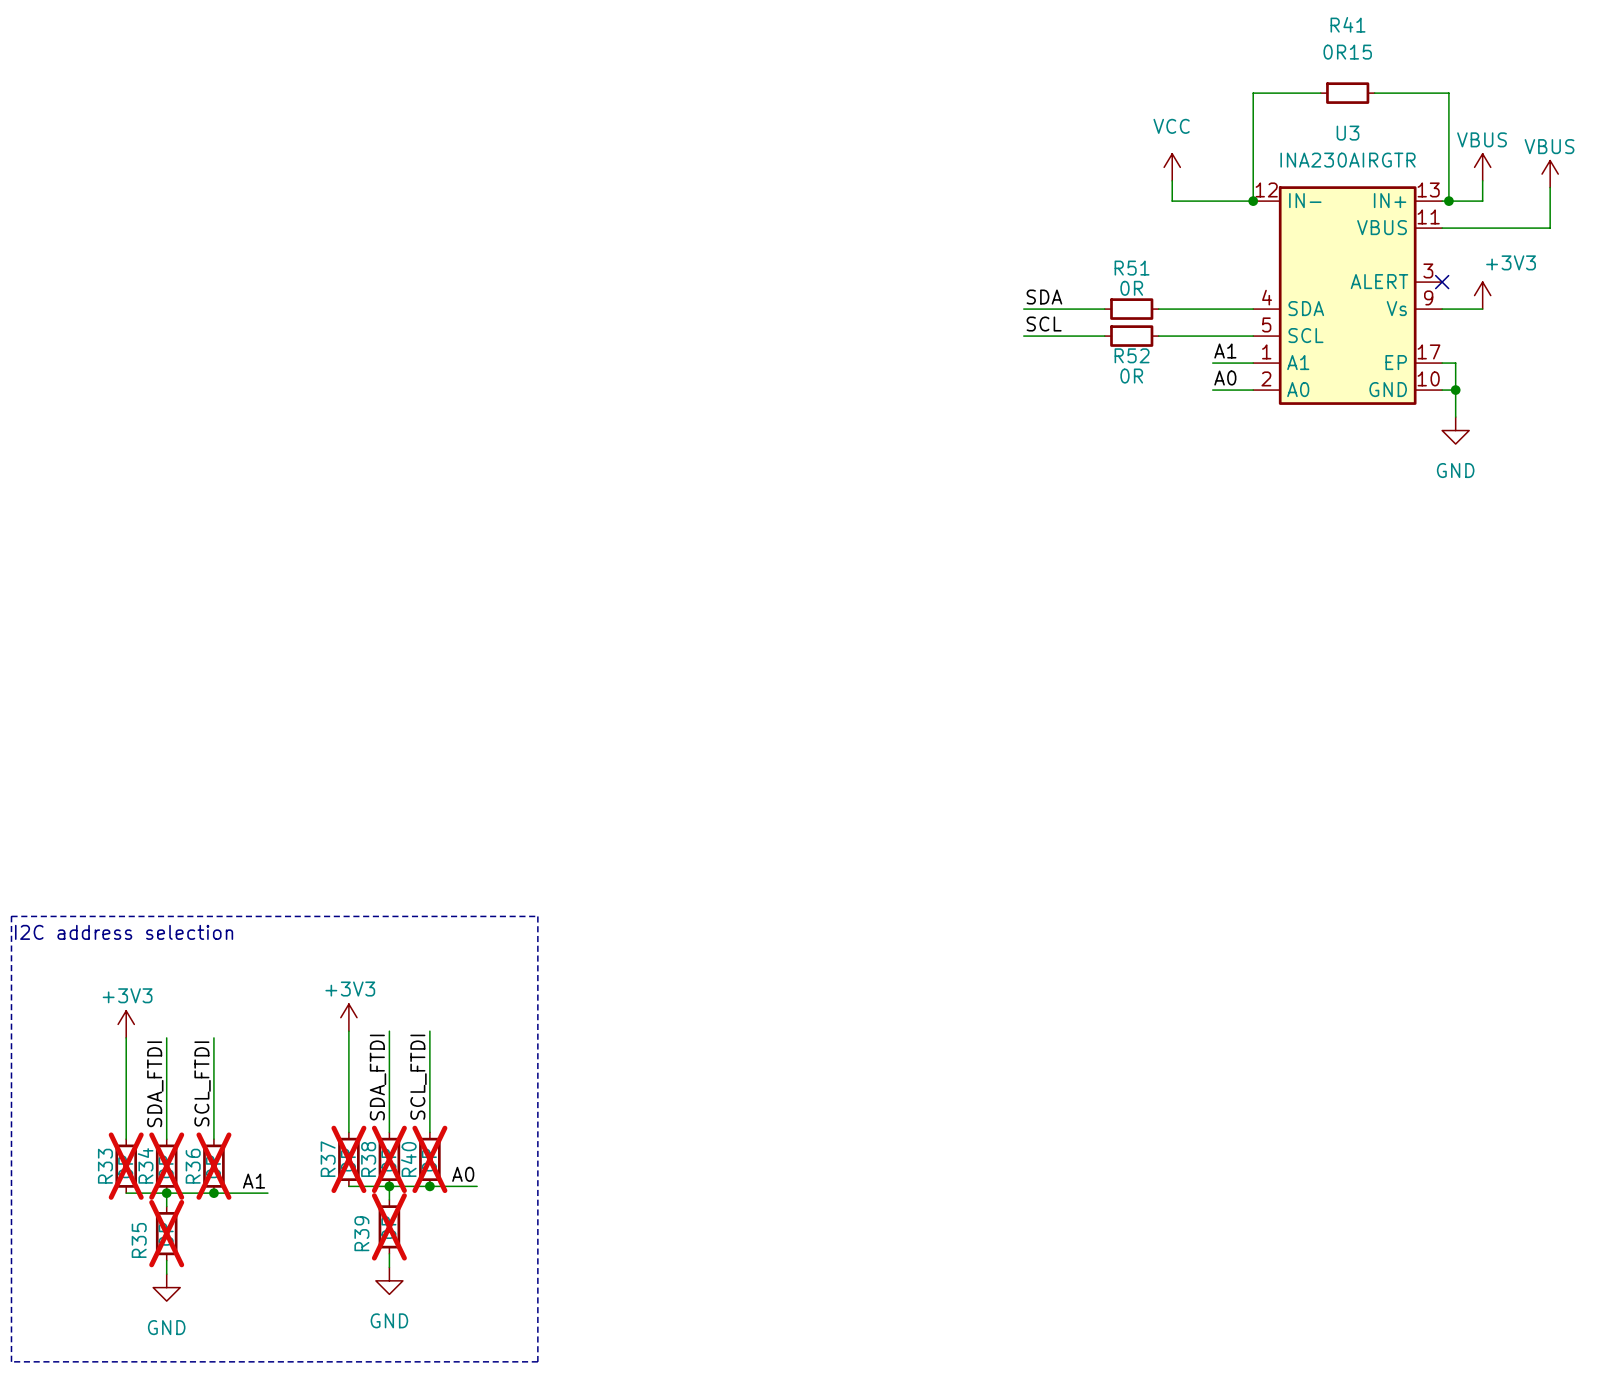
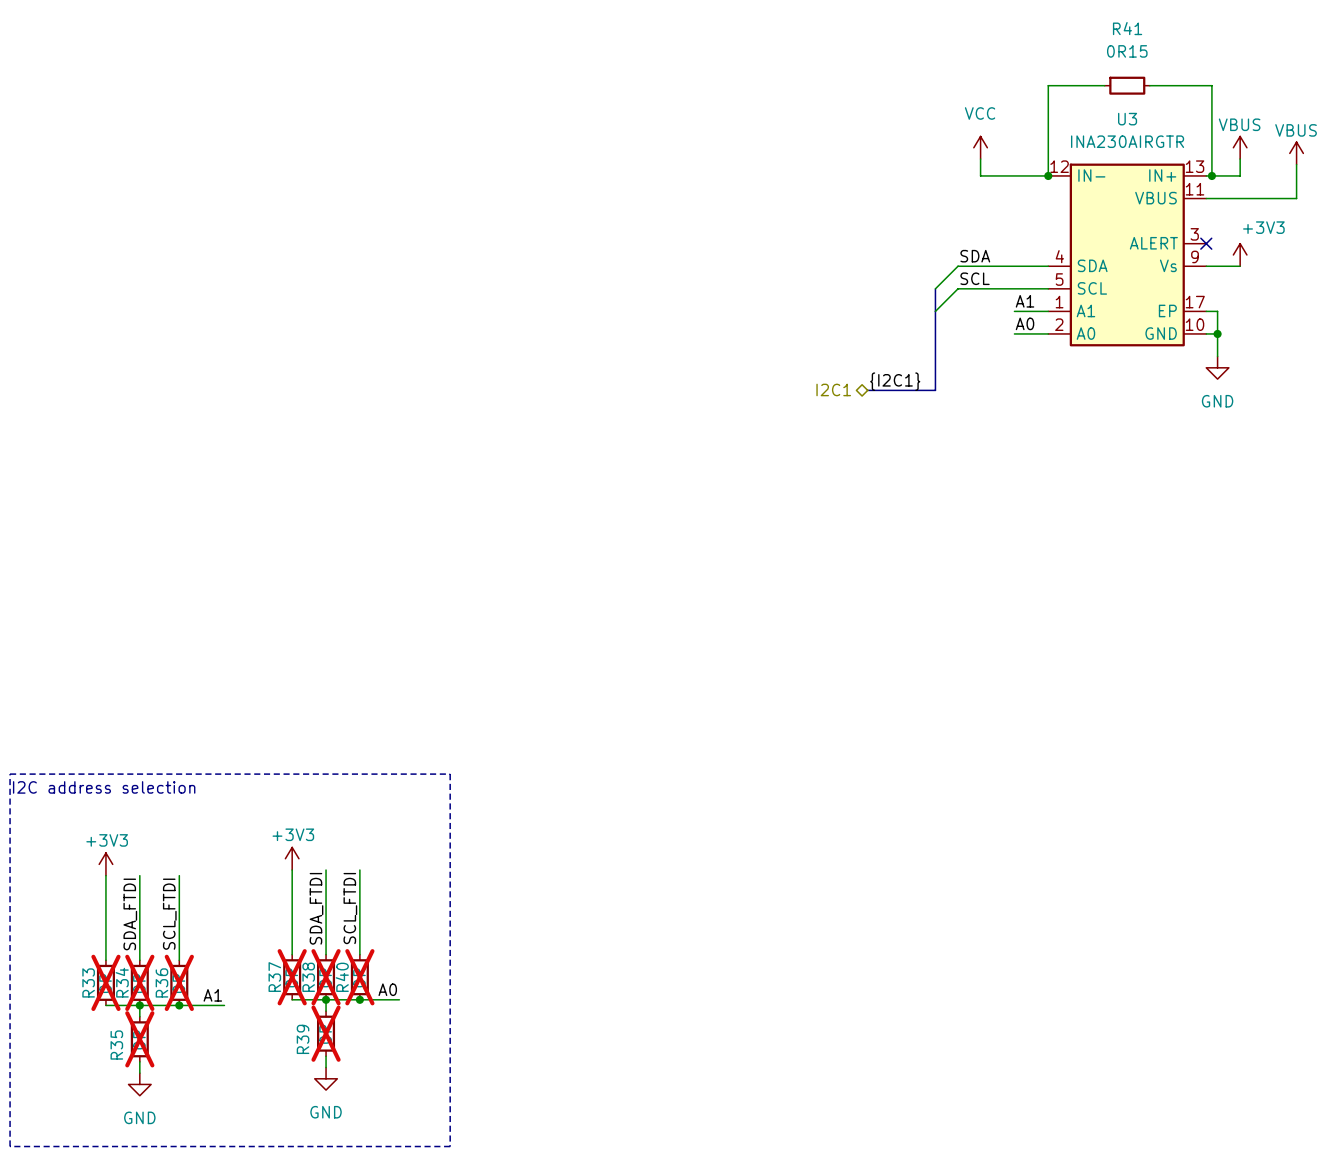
label position: SDA (1044, 297) -> SDA (975, 256)
wire: (1023, 309) (1104, 309) -> none
R51: (1131, 309) -> none
wire: none -> (969, 266) (958, 266) (935, 288)
label position: SCL (1044, 324) -> SCL (975, 278)
wire: (1023, 336) (1104, 336) -> none
bus: none -> (935, 288) (935, 390) (867, 390)
R52: (1131, 336) -> none
wire: none -> (969, 288) (958, 288) (935, 311)
label: none -> {I2C1} (895, 381)
hierarchical label: none -> I2C1 (833, 389)

